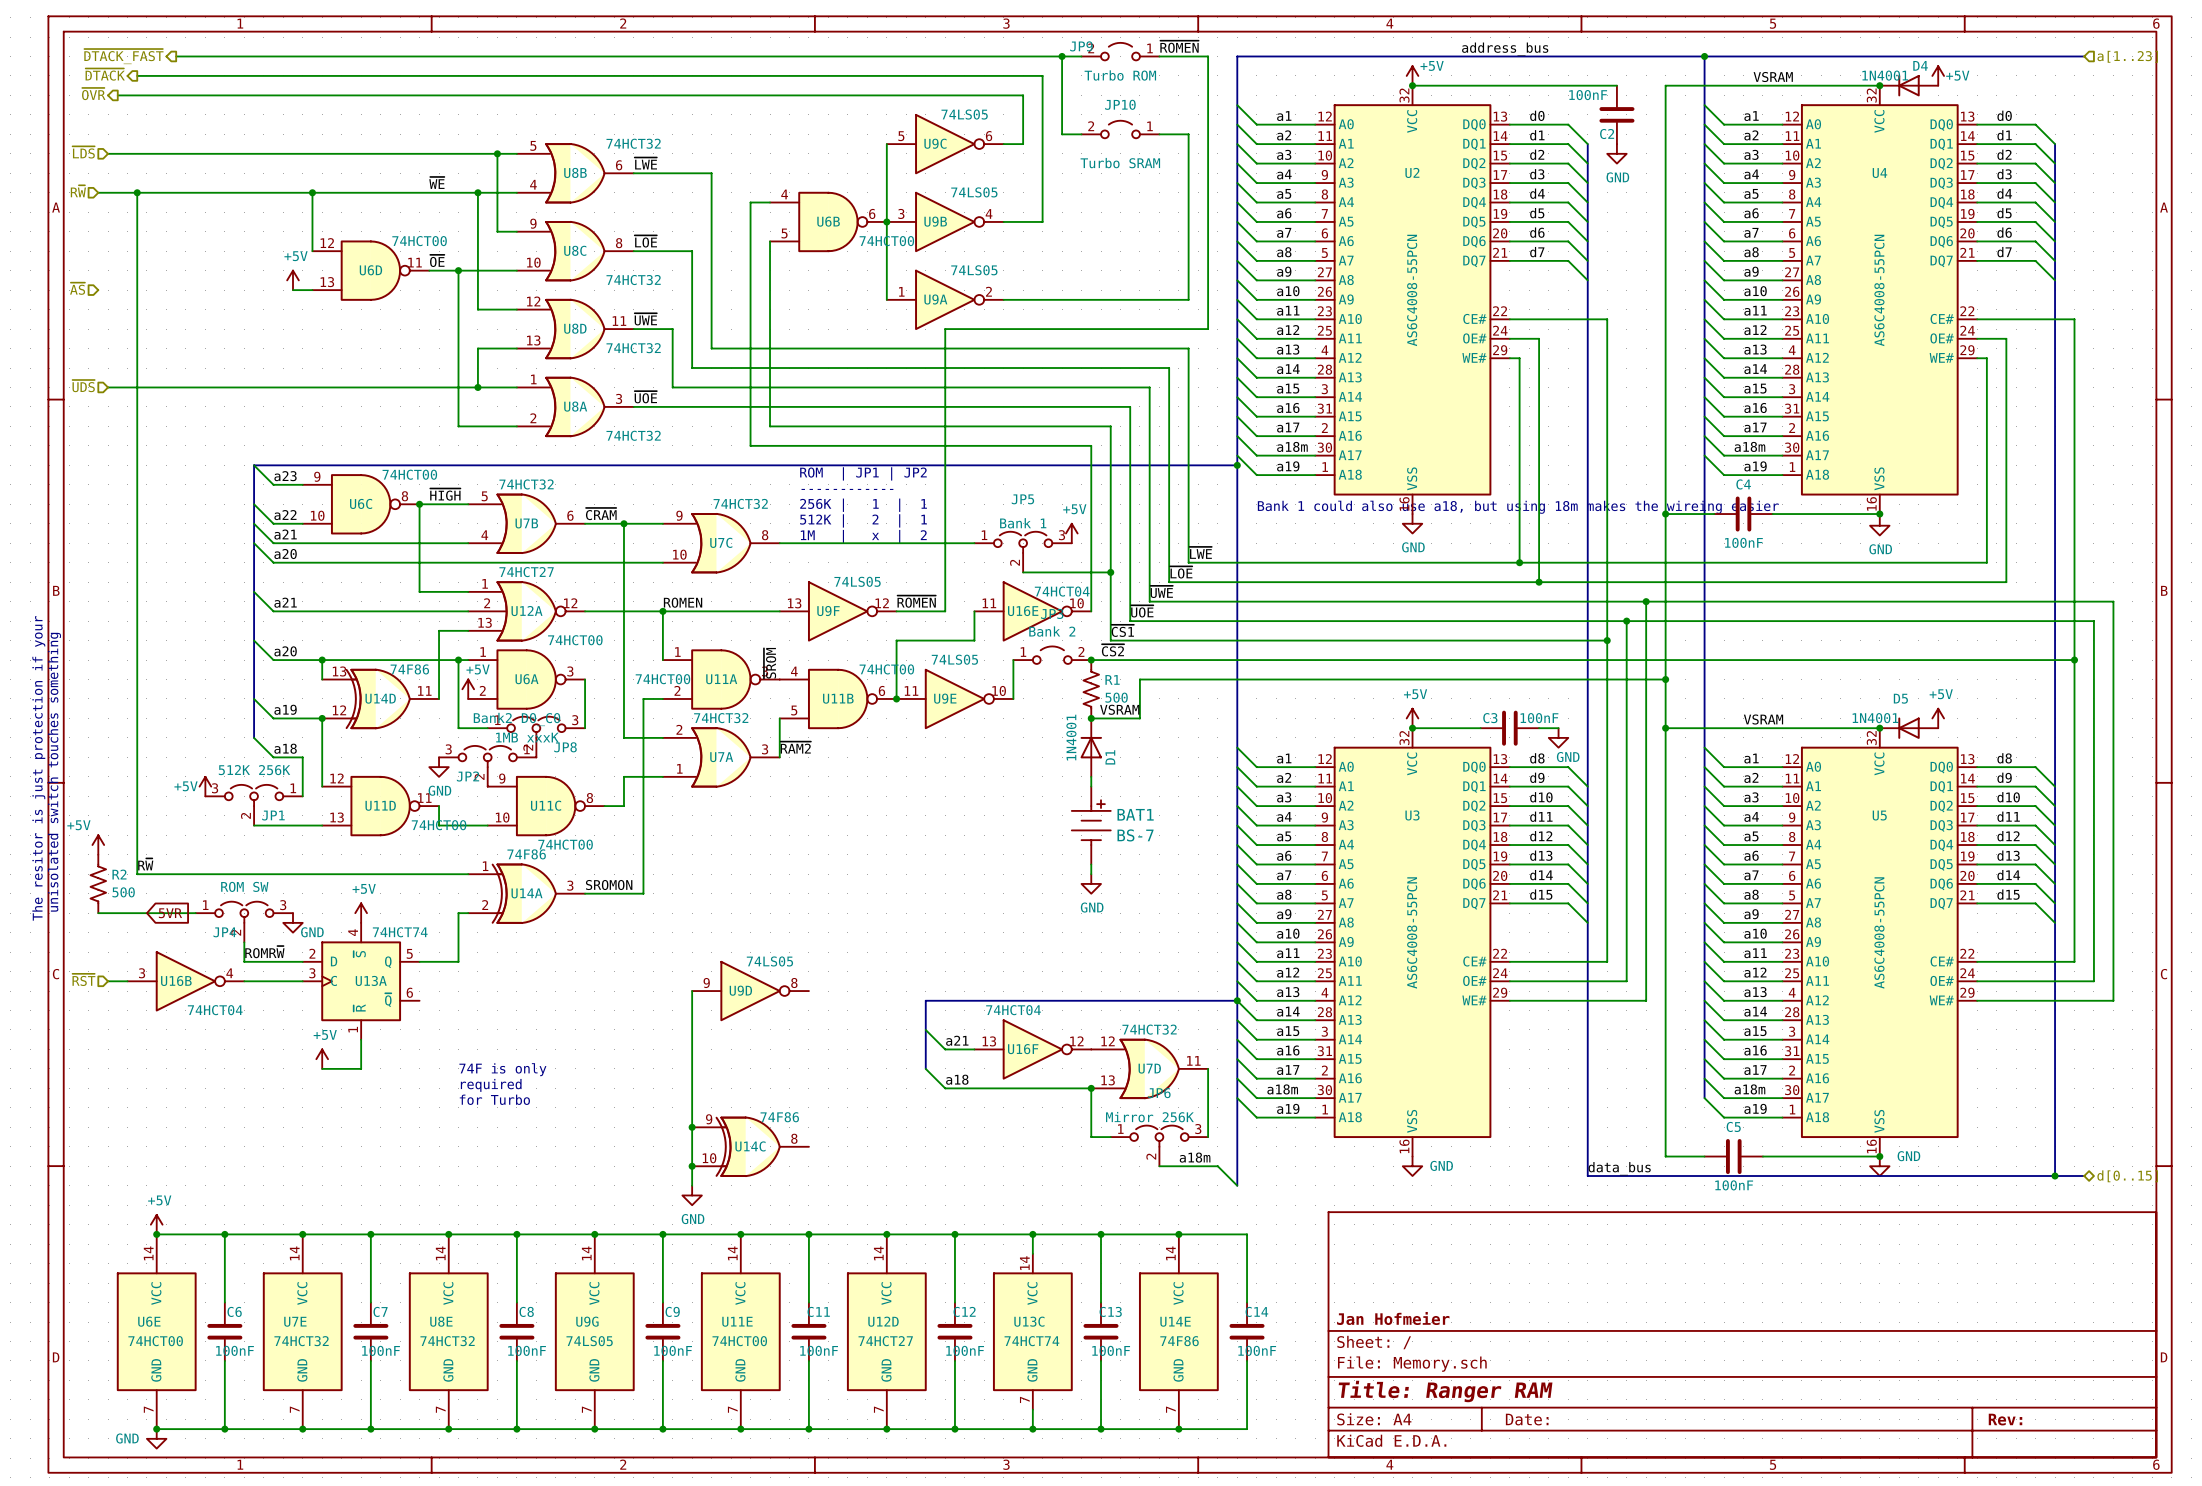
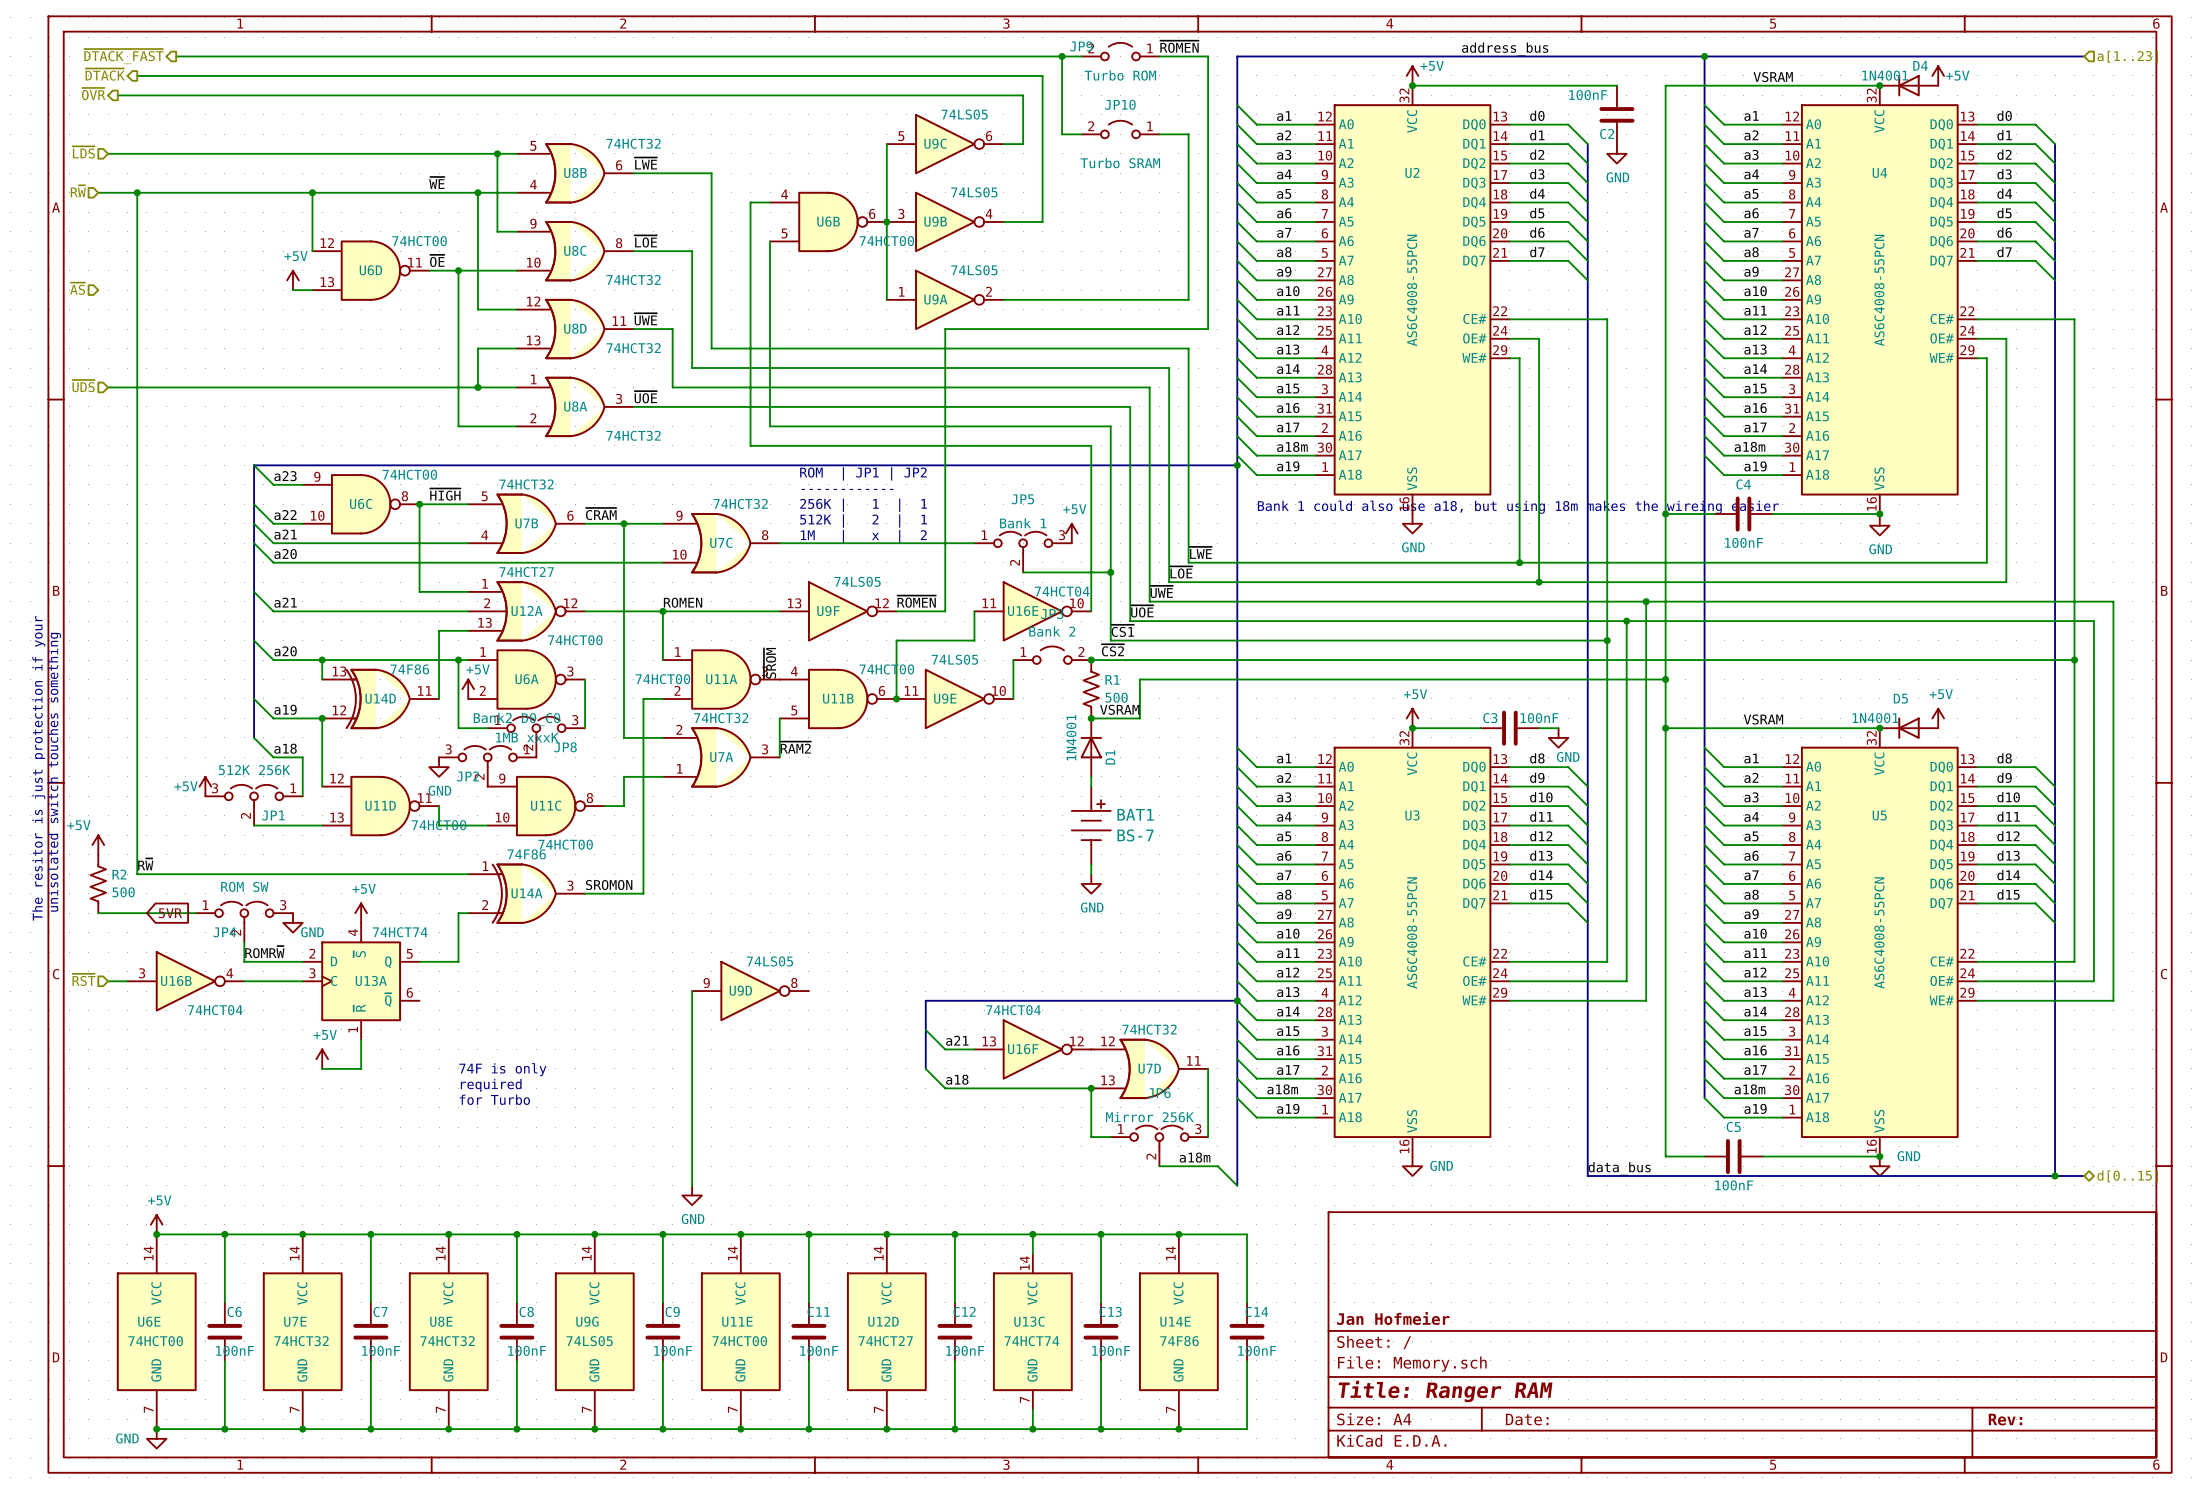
junction: (692, 1127) -> none
U14C: 74F86 (750, 1146) -> none
junction: (692, 1166) -> none

